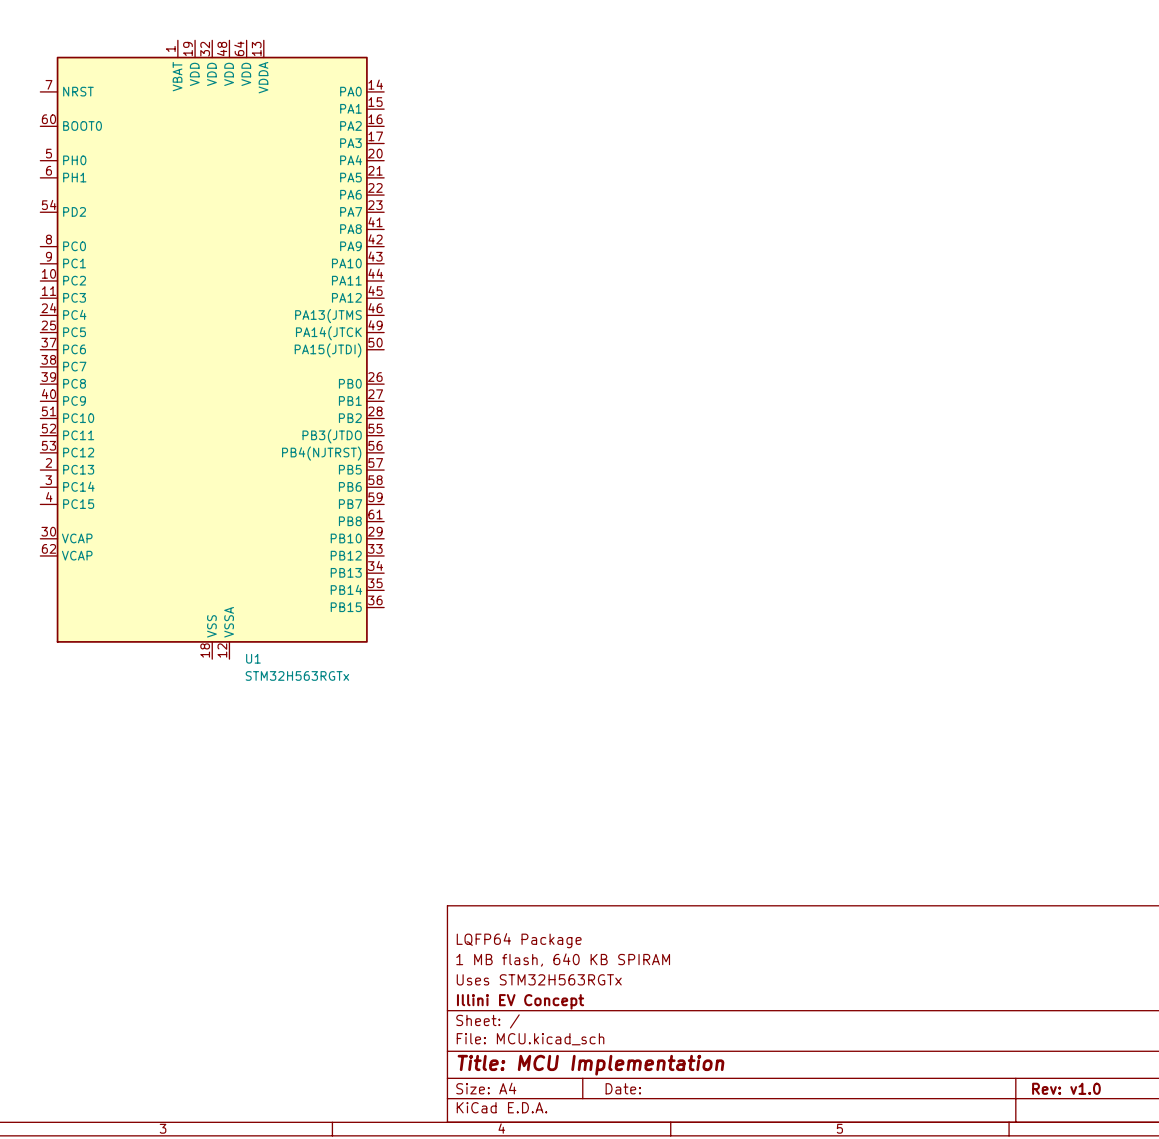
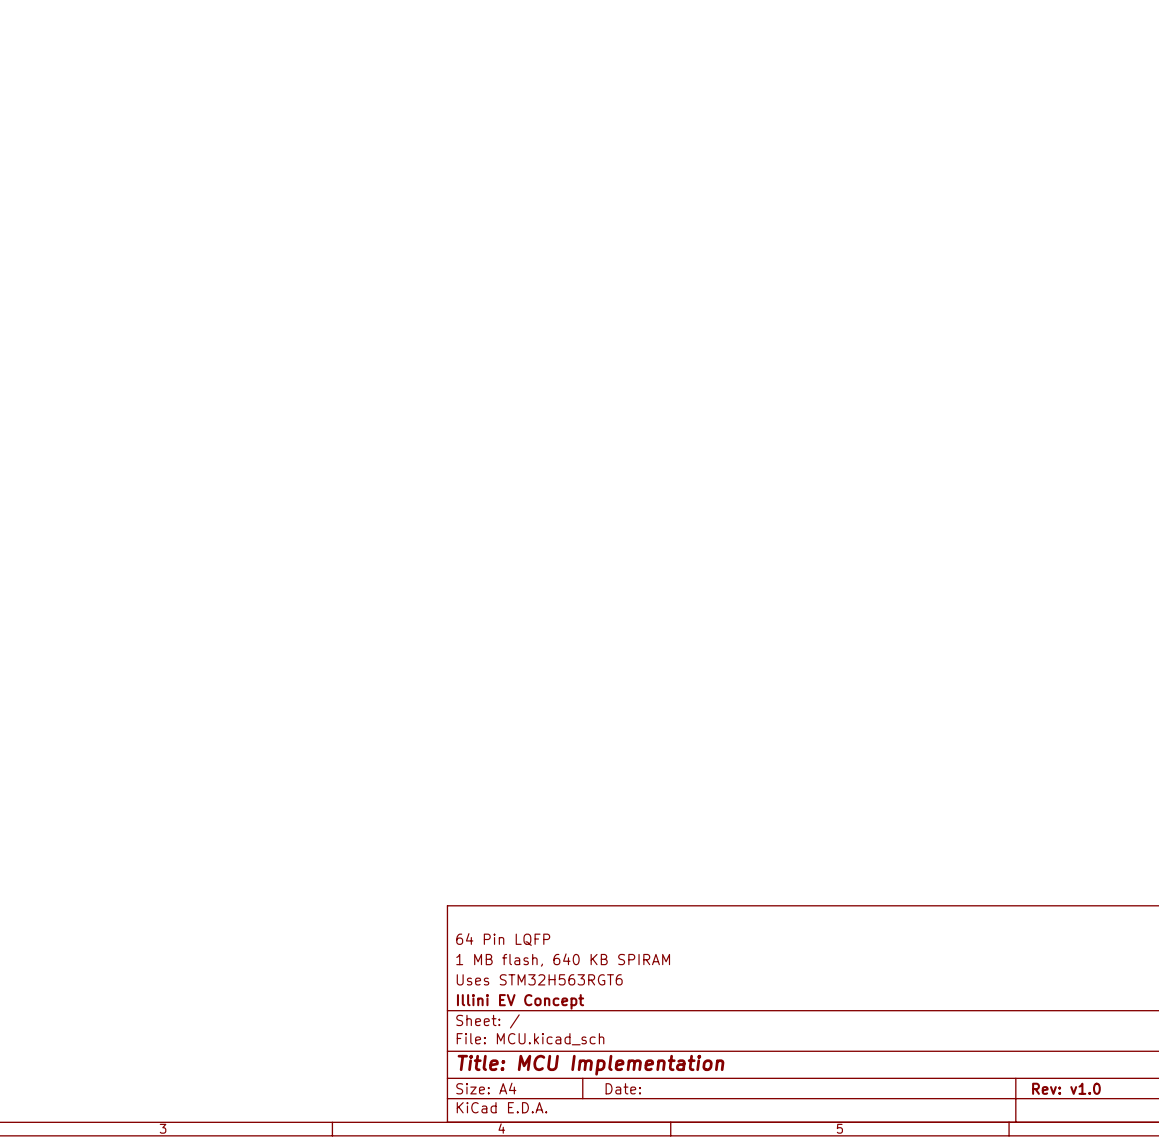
U1: STM32H563RGTx (212, 349) -> none
title block: LQFP64 Package (519, 940) -> 64 Pin LQFP (503, 939)
title block: Uses STM32H563RGTx (539, 979) -> Uses STM32H563RGT6 (539, 979)

